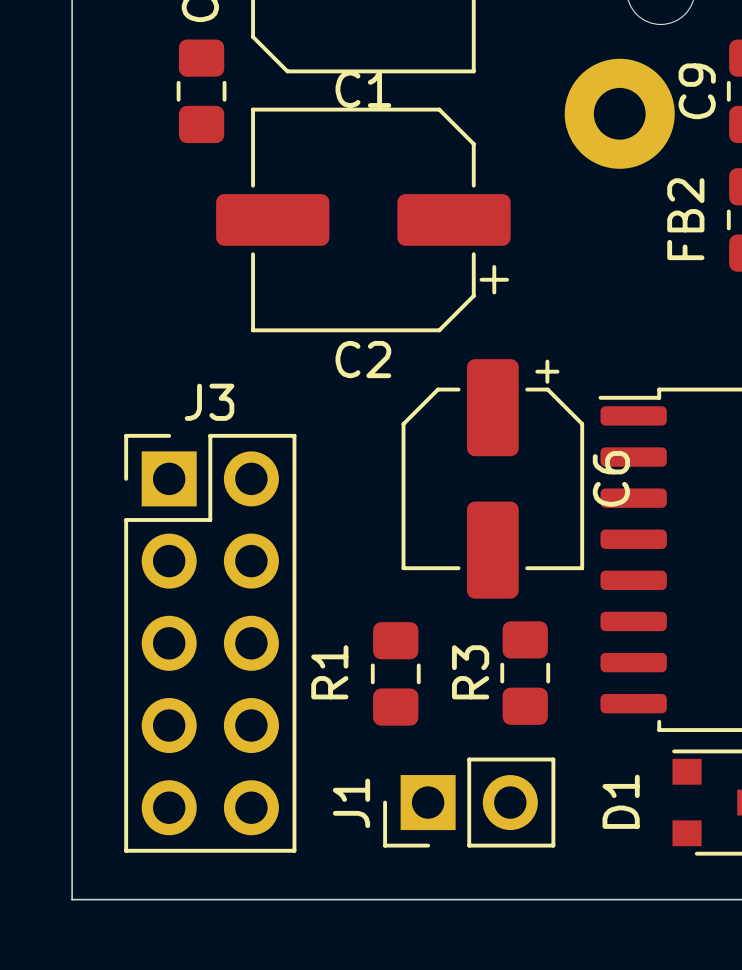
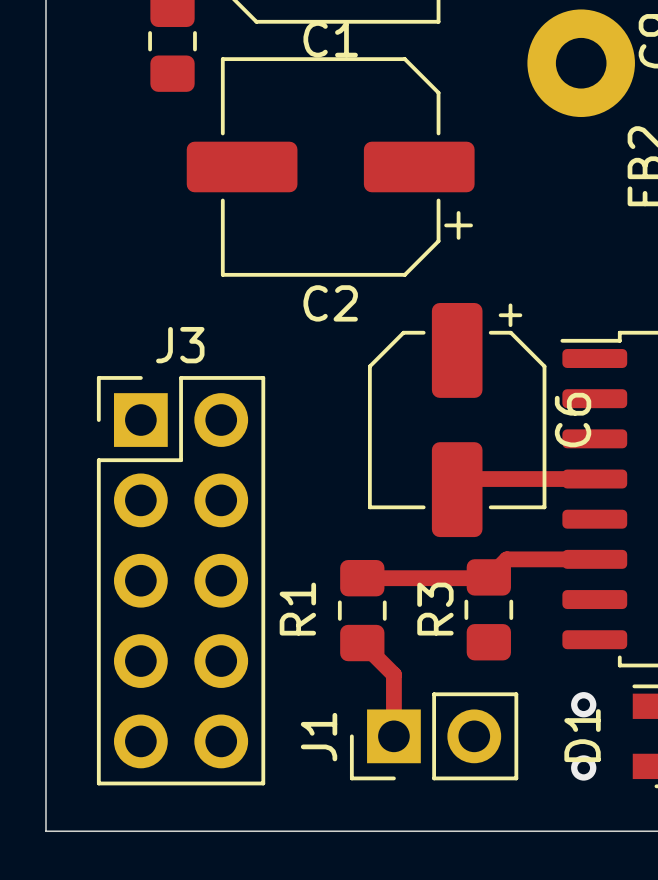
top track: none -> (594, 479) (467, 479) (457, 489)
top track: none -> (594, 559) (506, 559) (488, 578) (362, 578)
top track: none -> (362, 643) (393, 674) (393, 736)
via: none -> (583, 704)
via: none -> (583, 767)

